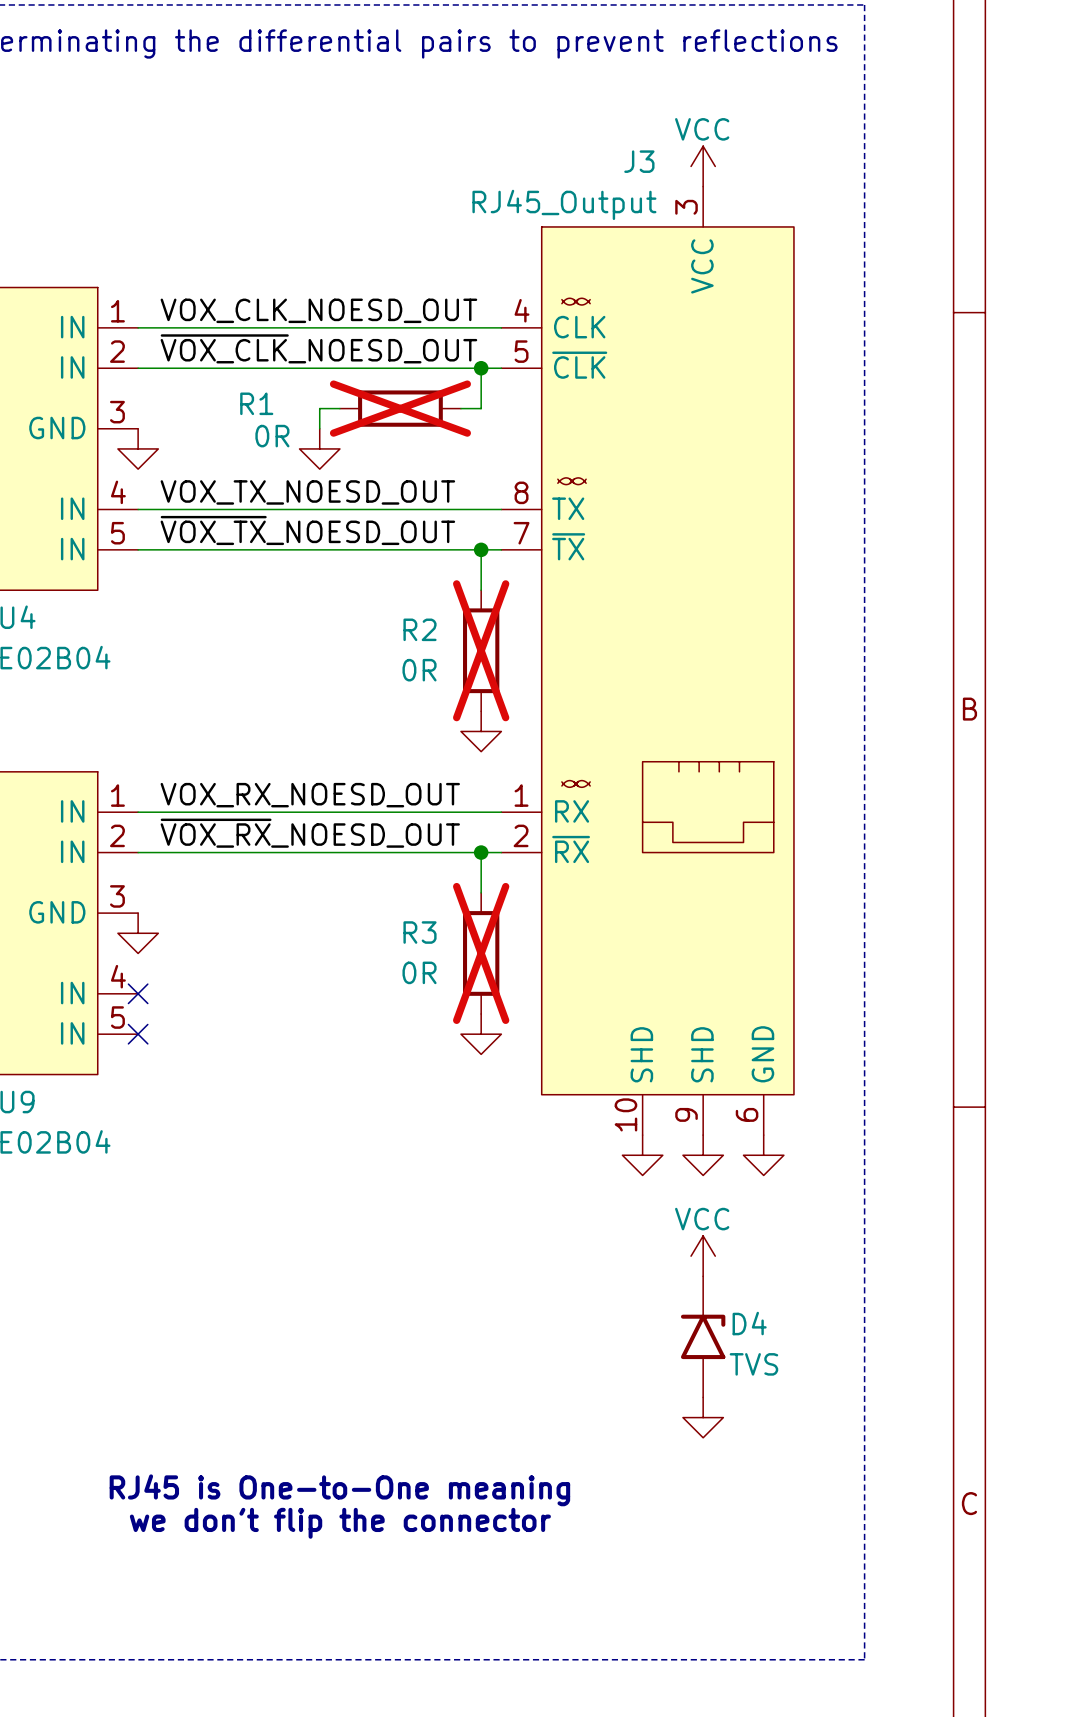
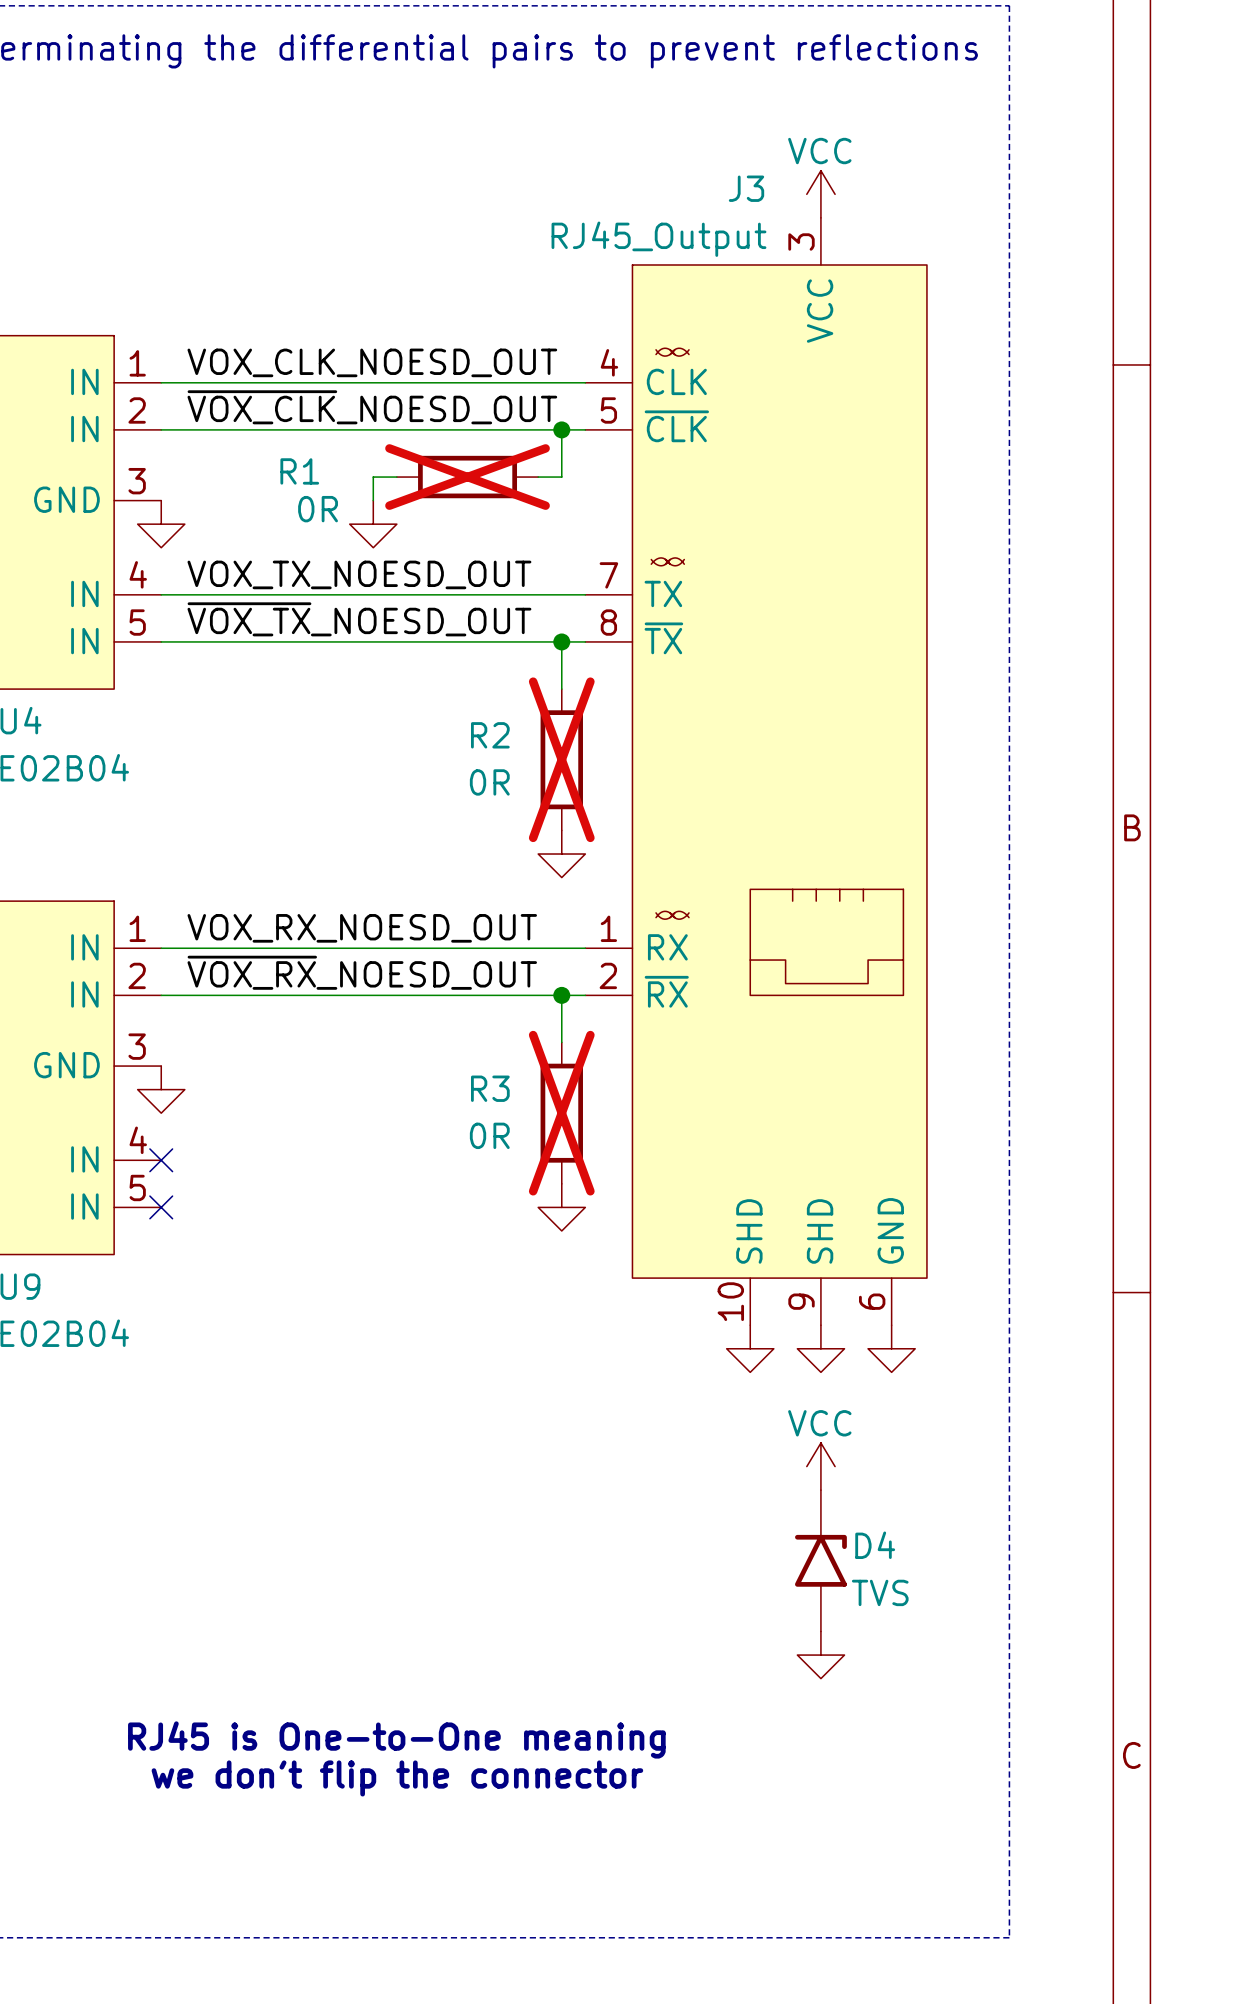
J3 pin number: 8 (521, 492) -> 7 (608, 575)
J3 pin number: 7 (521, 533) -> 8 (608, 622)

